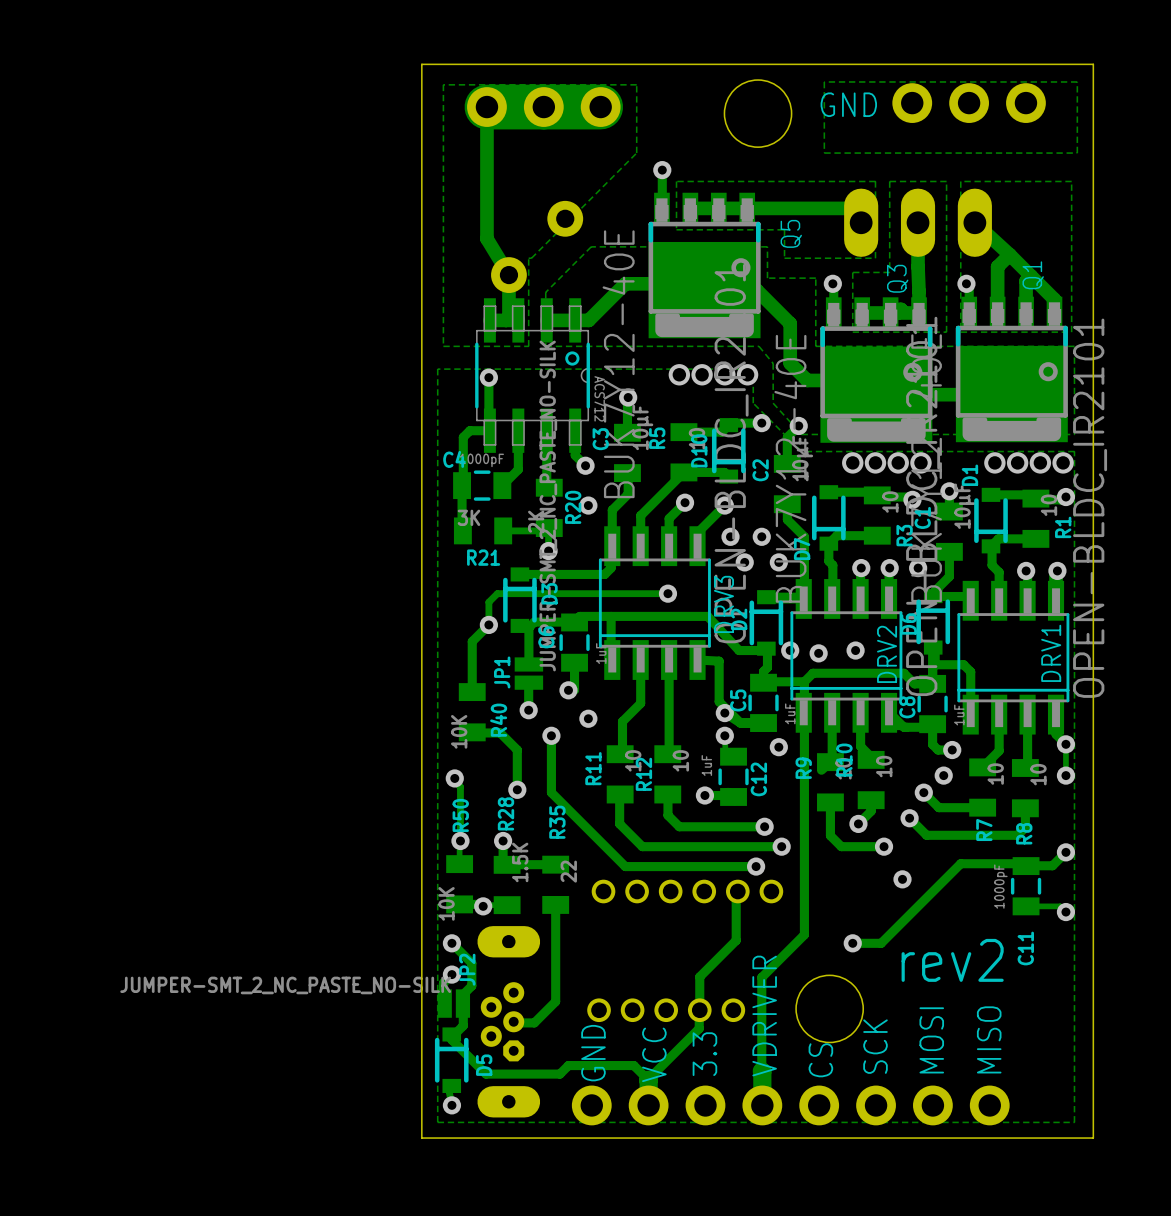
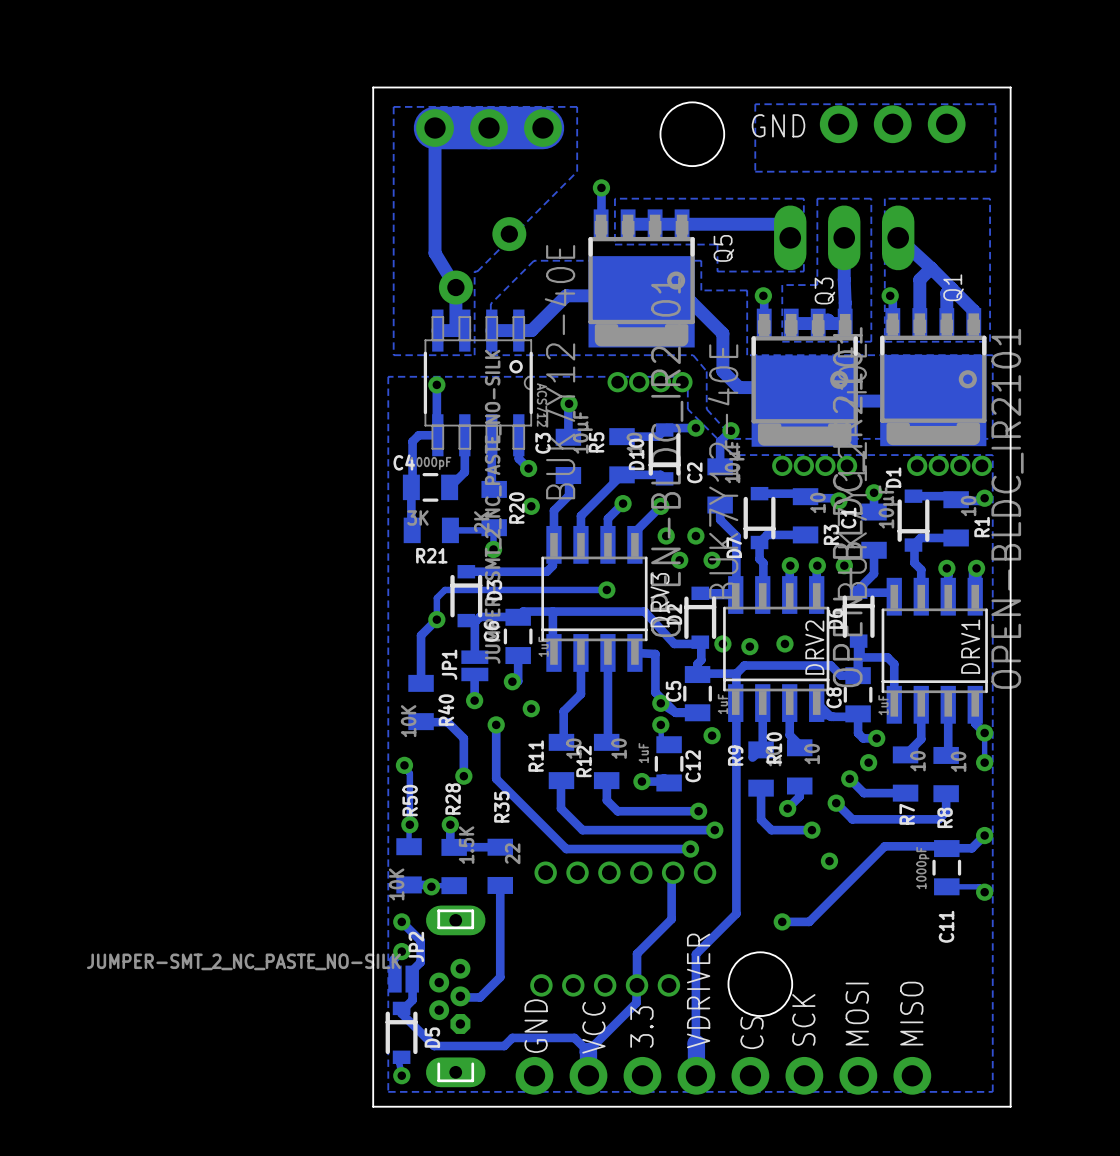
text: rev2 (952, 960) -> none

